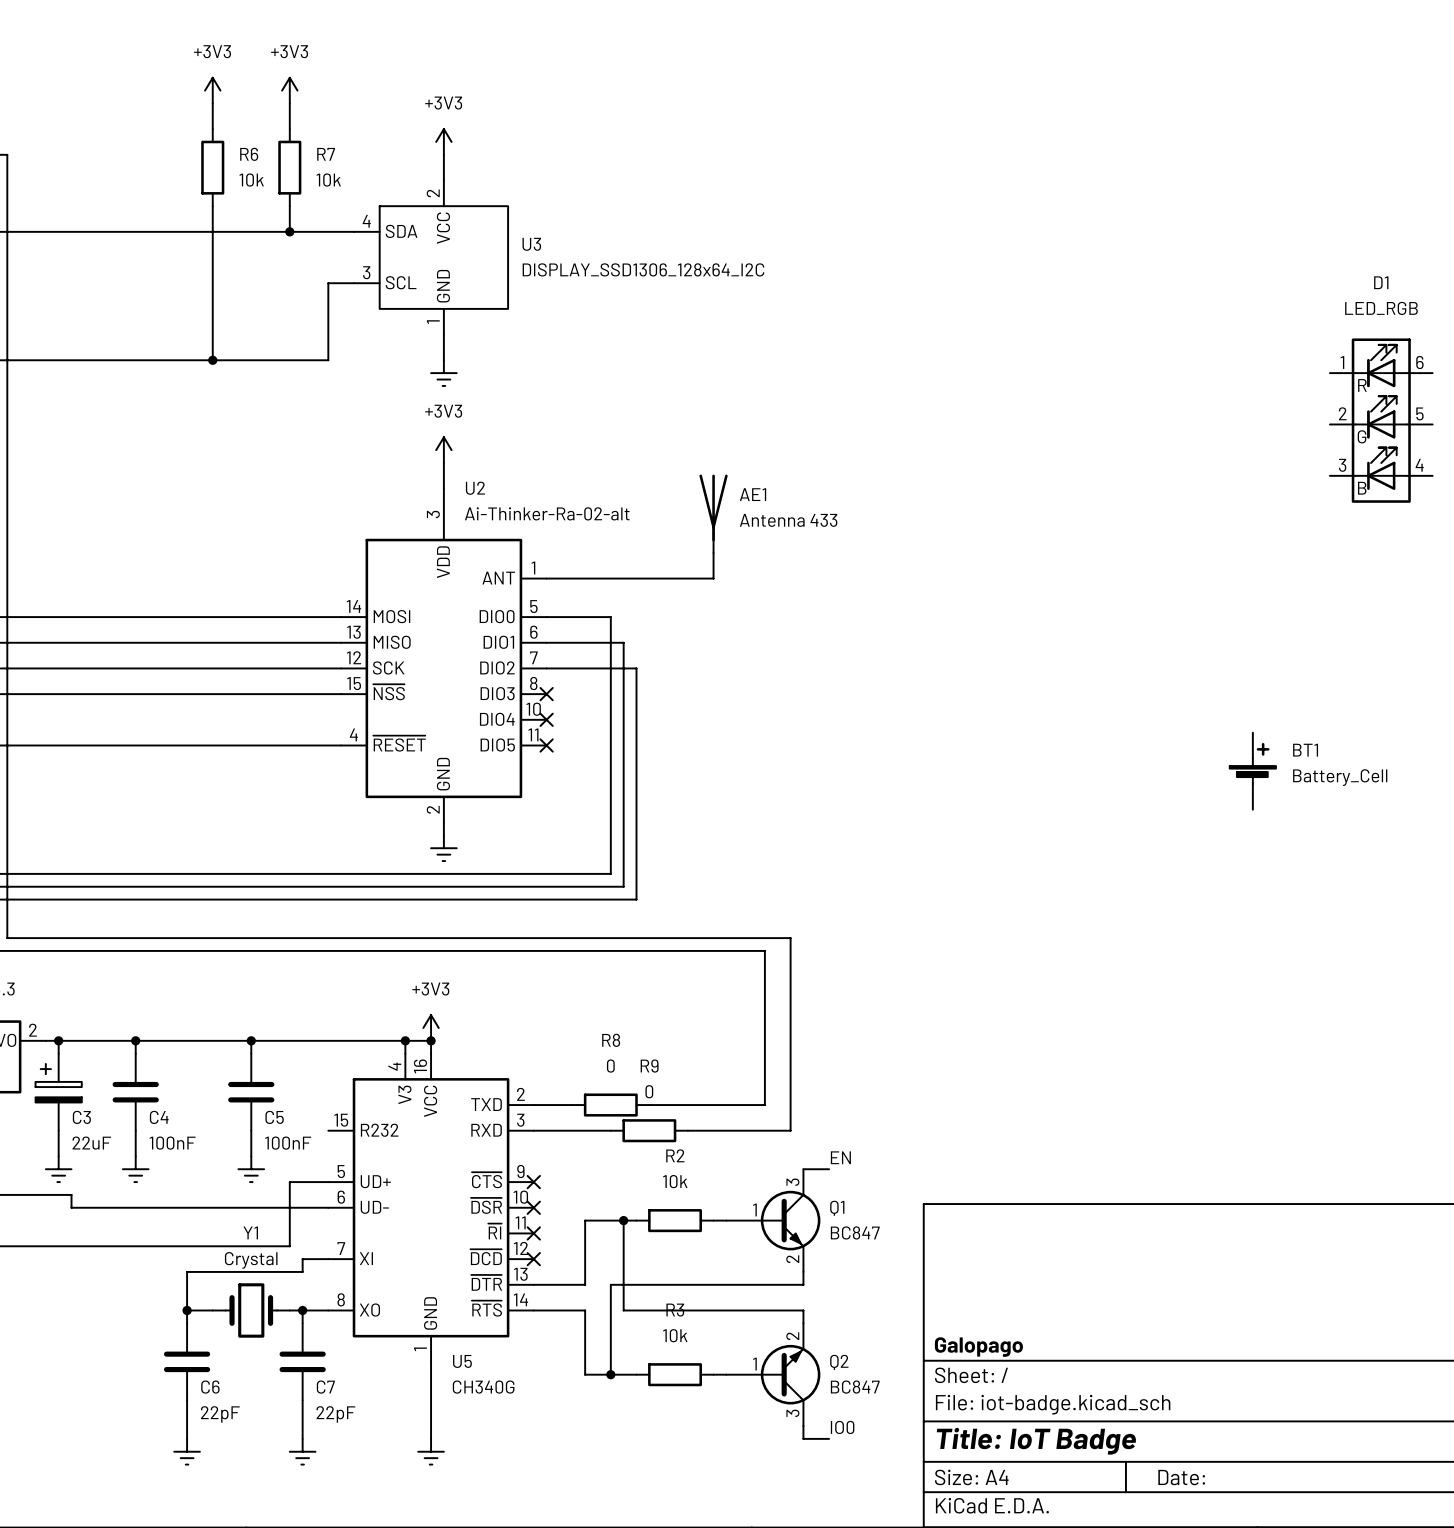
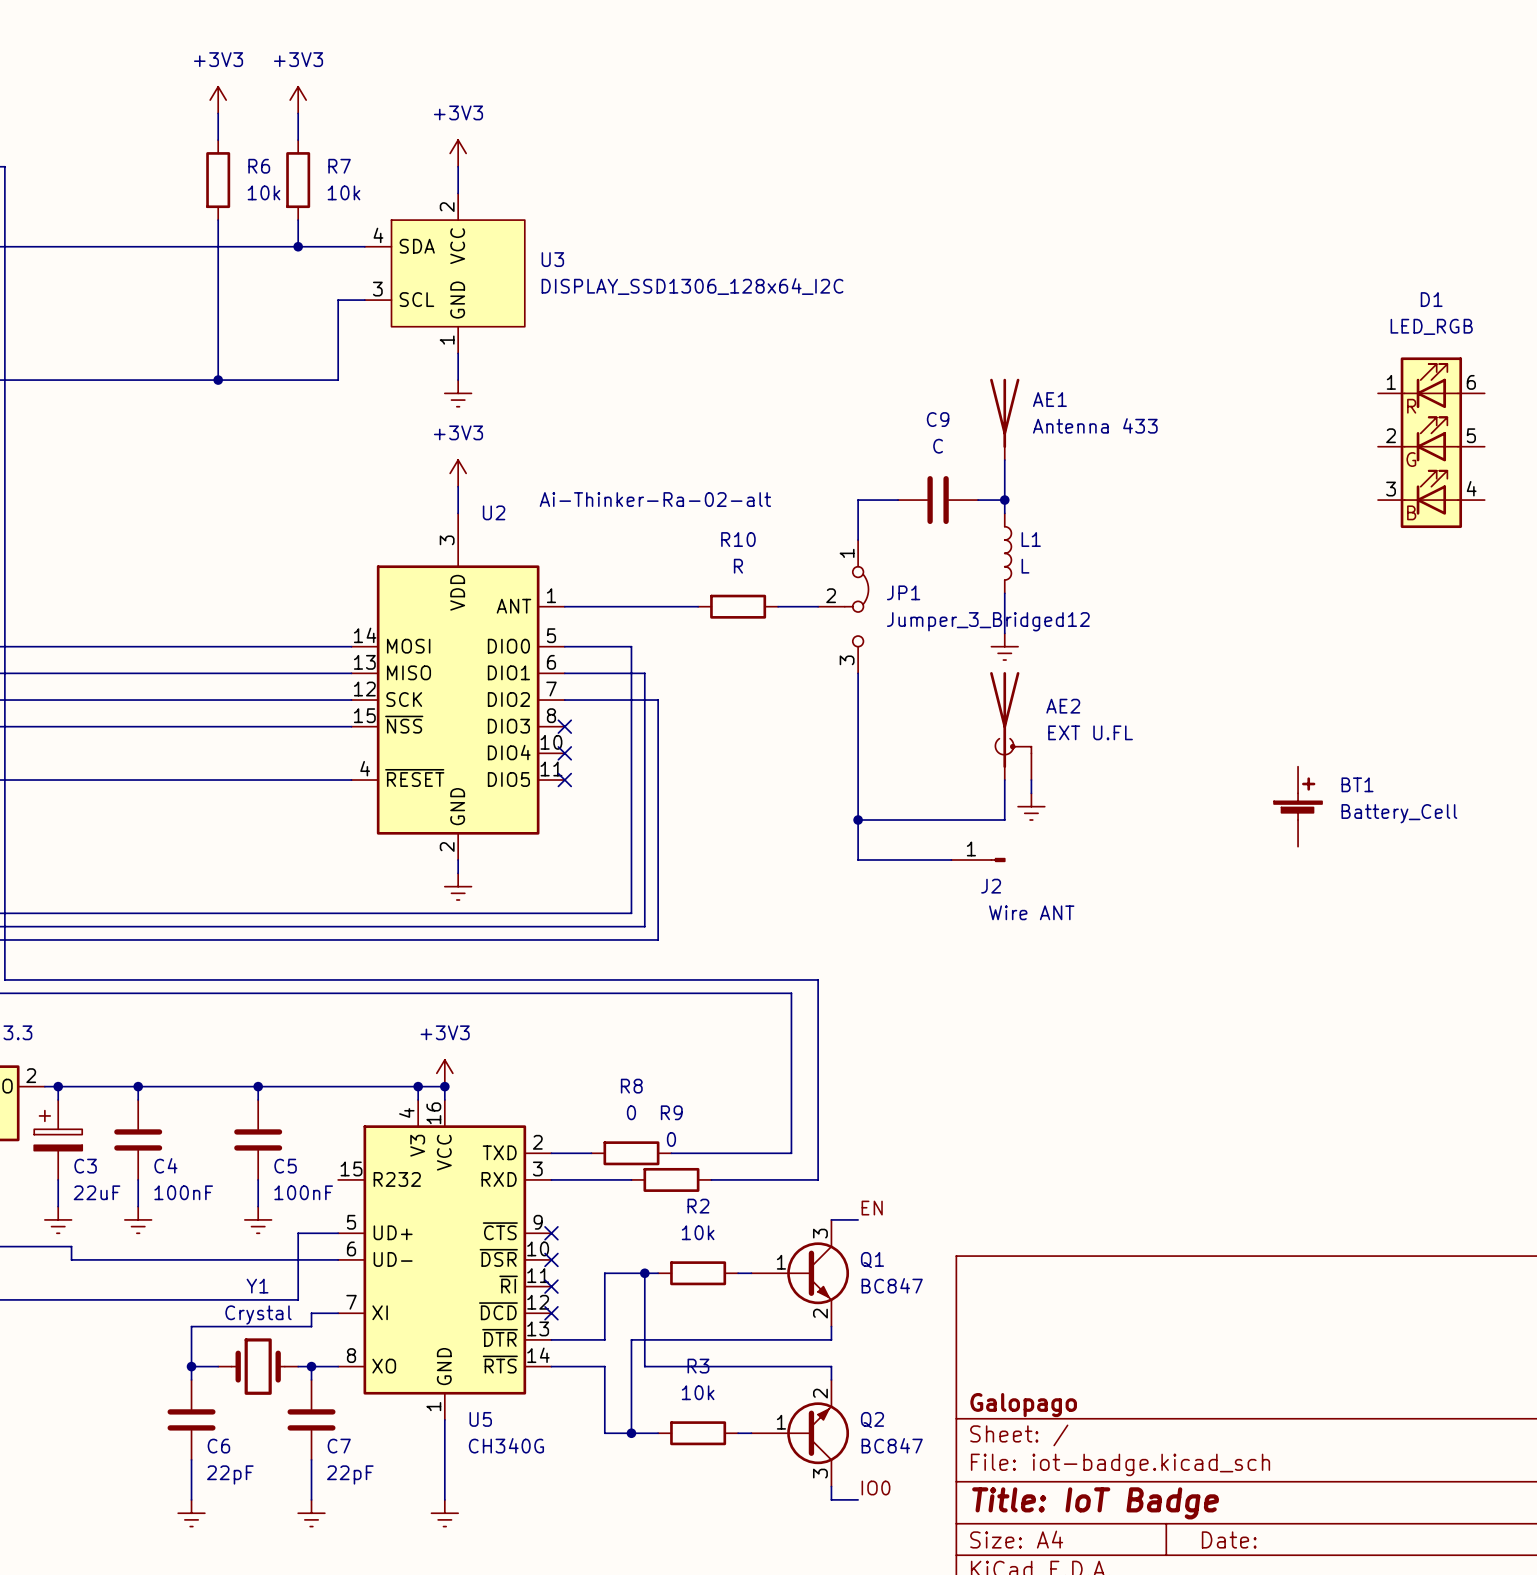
wire: none -> (1004, 460) (1004, 513)
wire: none -> (898, 500) (858, 500) (858, 540)
C9: none -> C (938, 500)
wire: none -> (978, 500) (1004, 500)
junction: none -> (1004, 500)
U2 value position: Ai-Thinker-Ra-02-alt (547, 513) -> Ai-Thinker-Ra-02-alt (655, 499)
AE1 position: (713, 513) -> (1004, 419)
L1: none -> L (1008, 553)
wire: (713, 552) (713, 578) (675, 578) -> none
wire: none -> (1004, 593) (1004, 633)
R10: none -> R (738, 606)
wire: none -> (778, 606) (818, 606)
JP1: none -> Jumper_3_Bridged12 (843, 606)
power symbol: none -> (1004, 646)
wire: none -> (858, 673) (858, 859) (951, 859)
AE2: none -> EXT U.FL (1010, 726)
wire: none -> (1004, 780) (1004, 820) (858, 820)
wire: none -> (1031, 780) (1031, 793)
power symbol: none -> (1031, 806)
junction: none -> (858, 820)
J2: none -> Wire ANT (978, 859)

